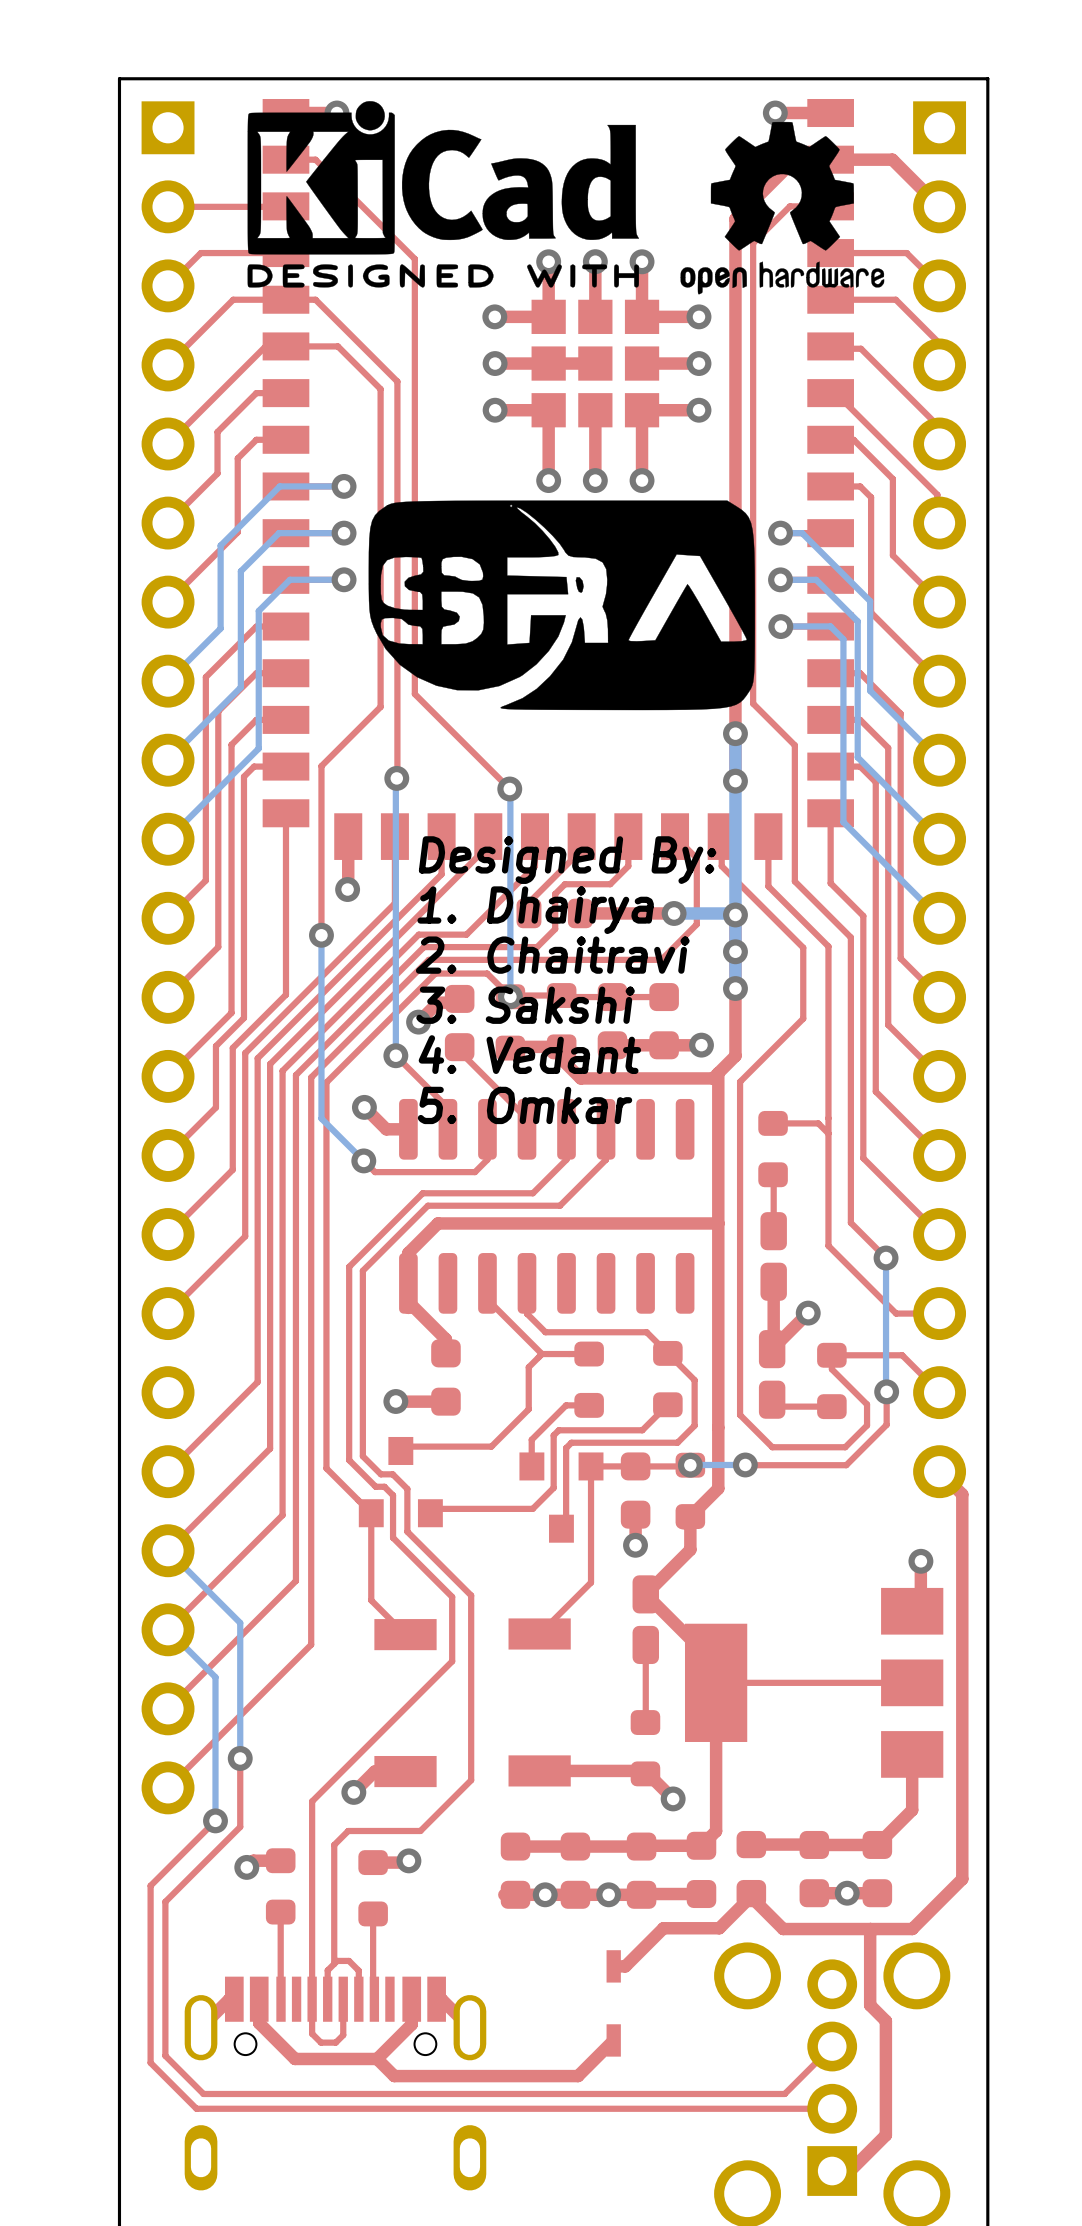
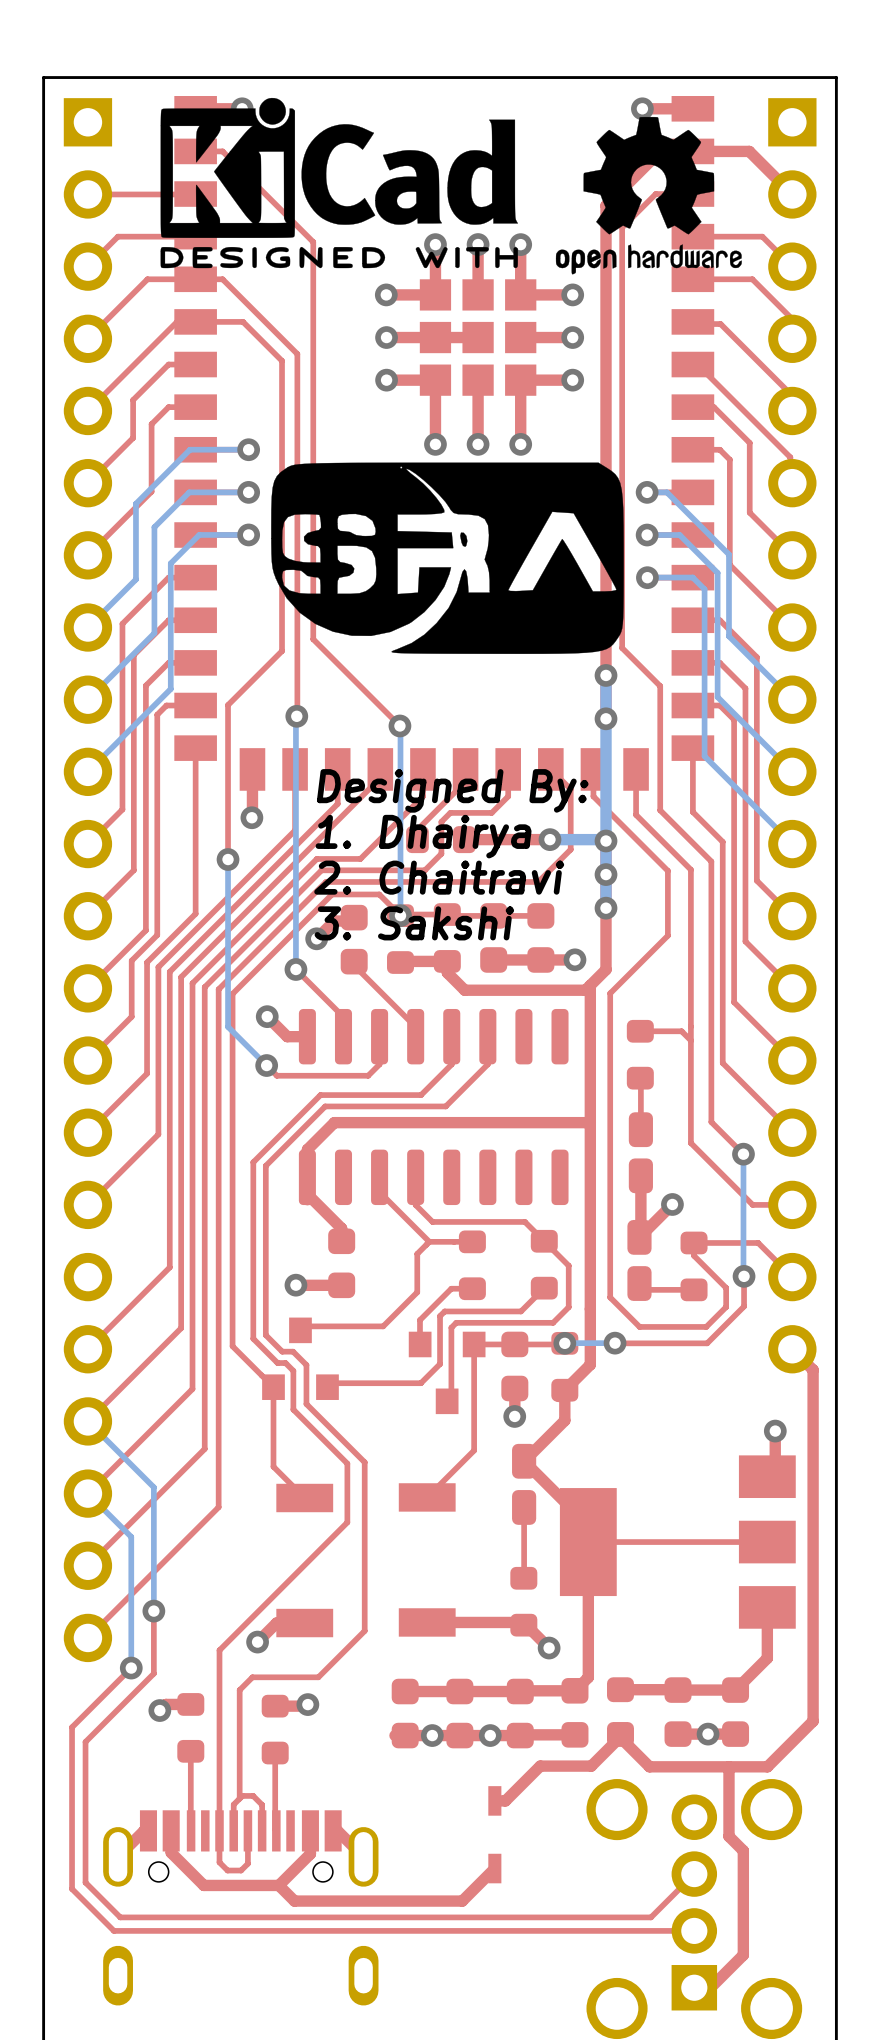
text: 4. Vedant (529, 1054) -> none
text: 5. Omkar (524, 1105) -> none

